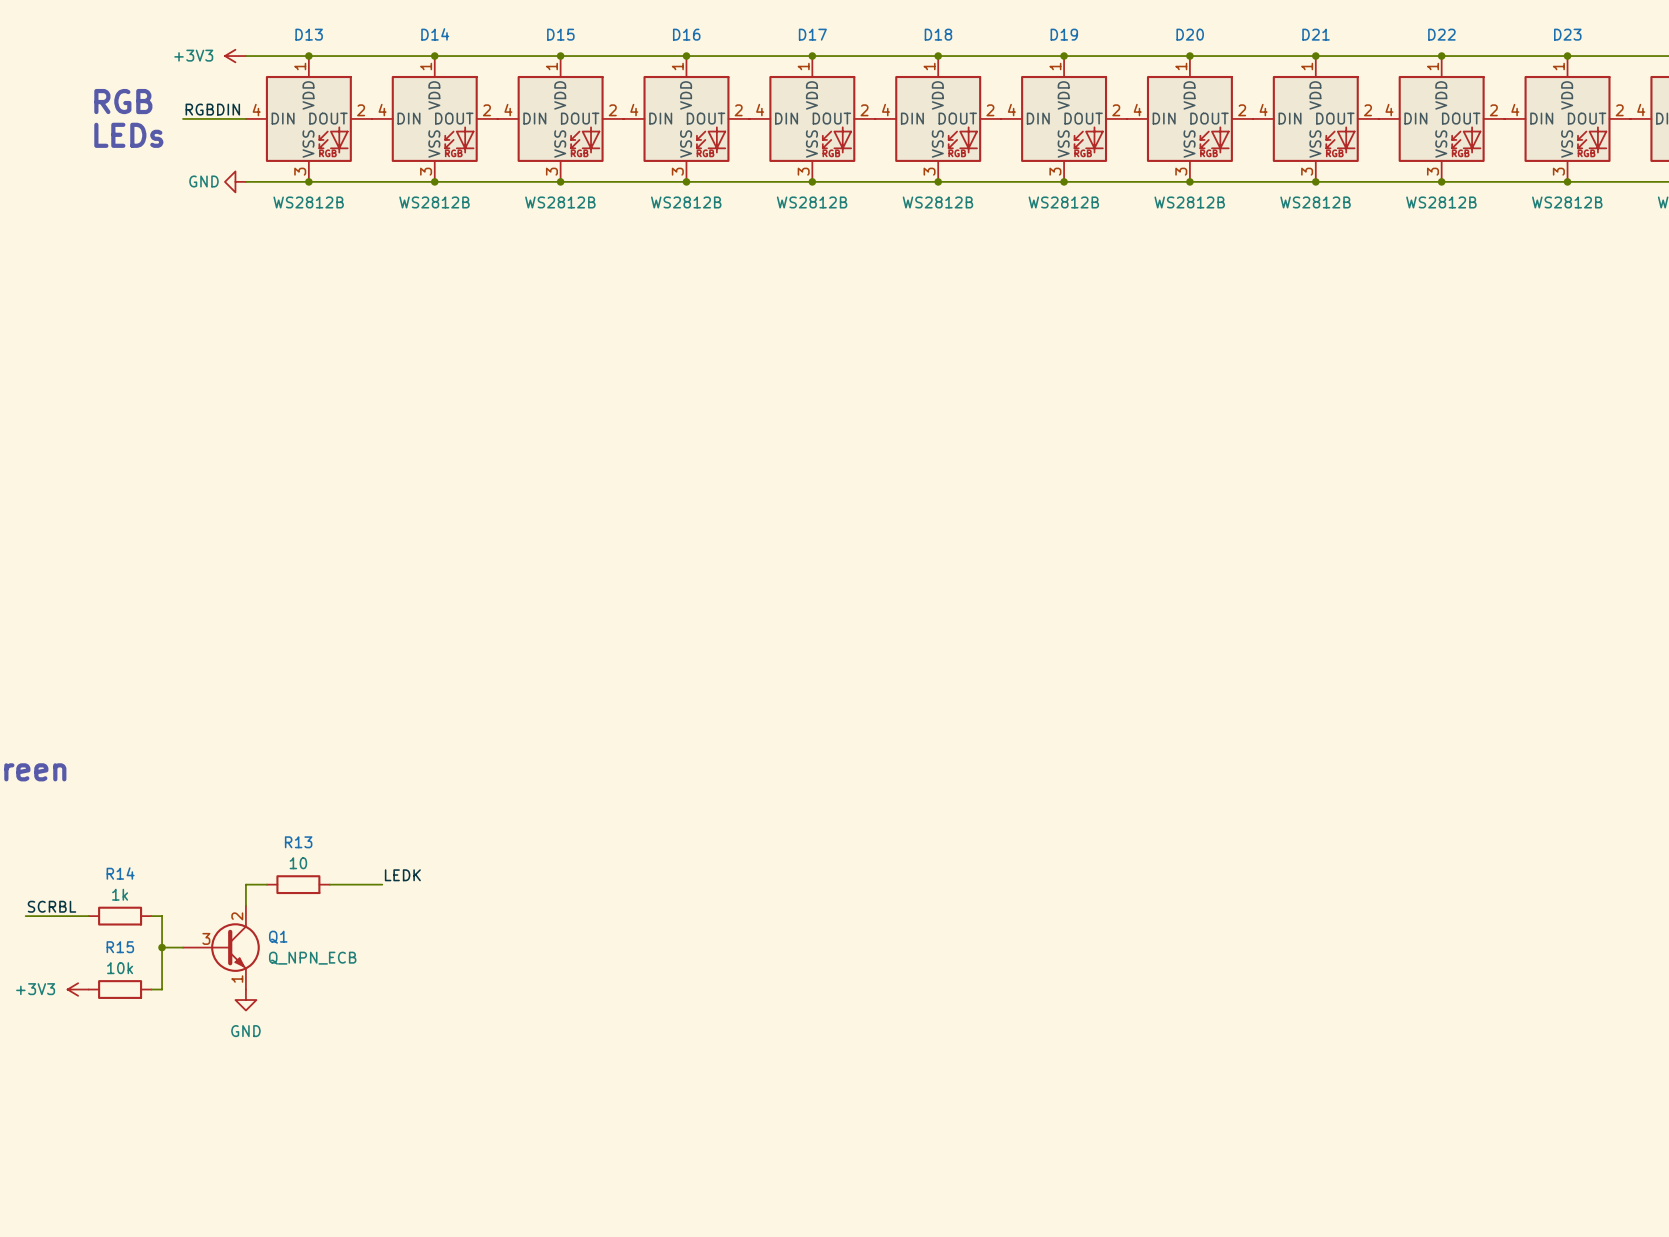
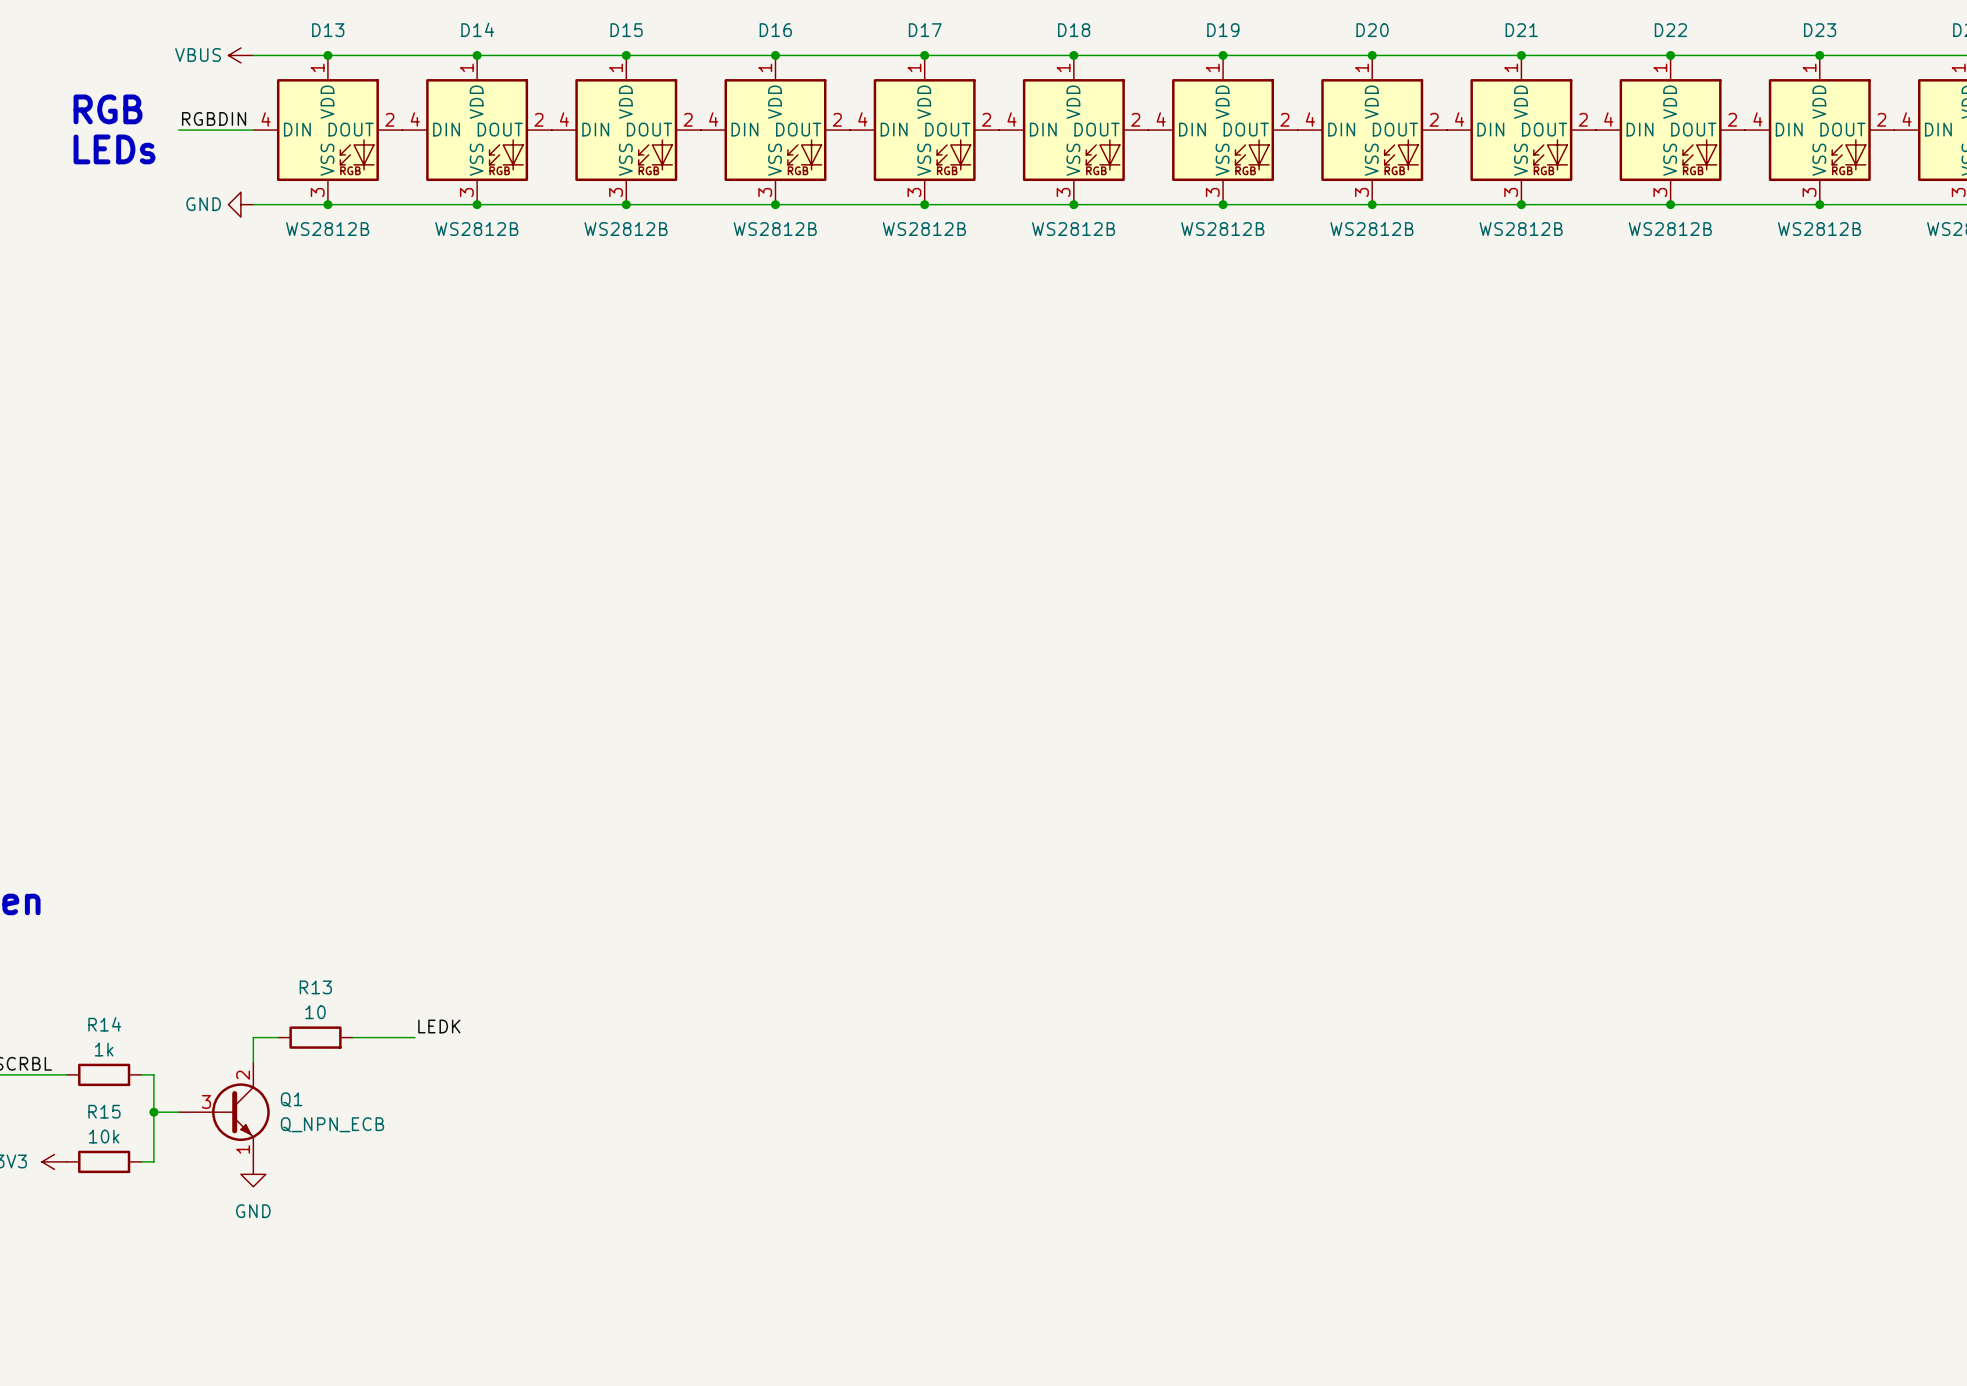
power symbol: +3V3 (235, 56) -> VBUS (240, 55)

